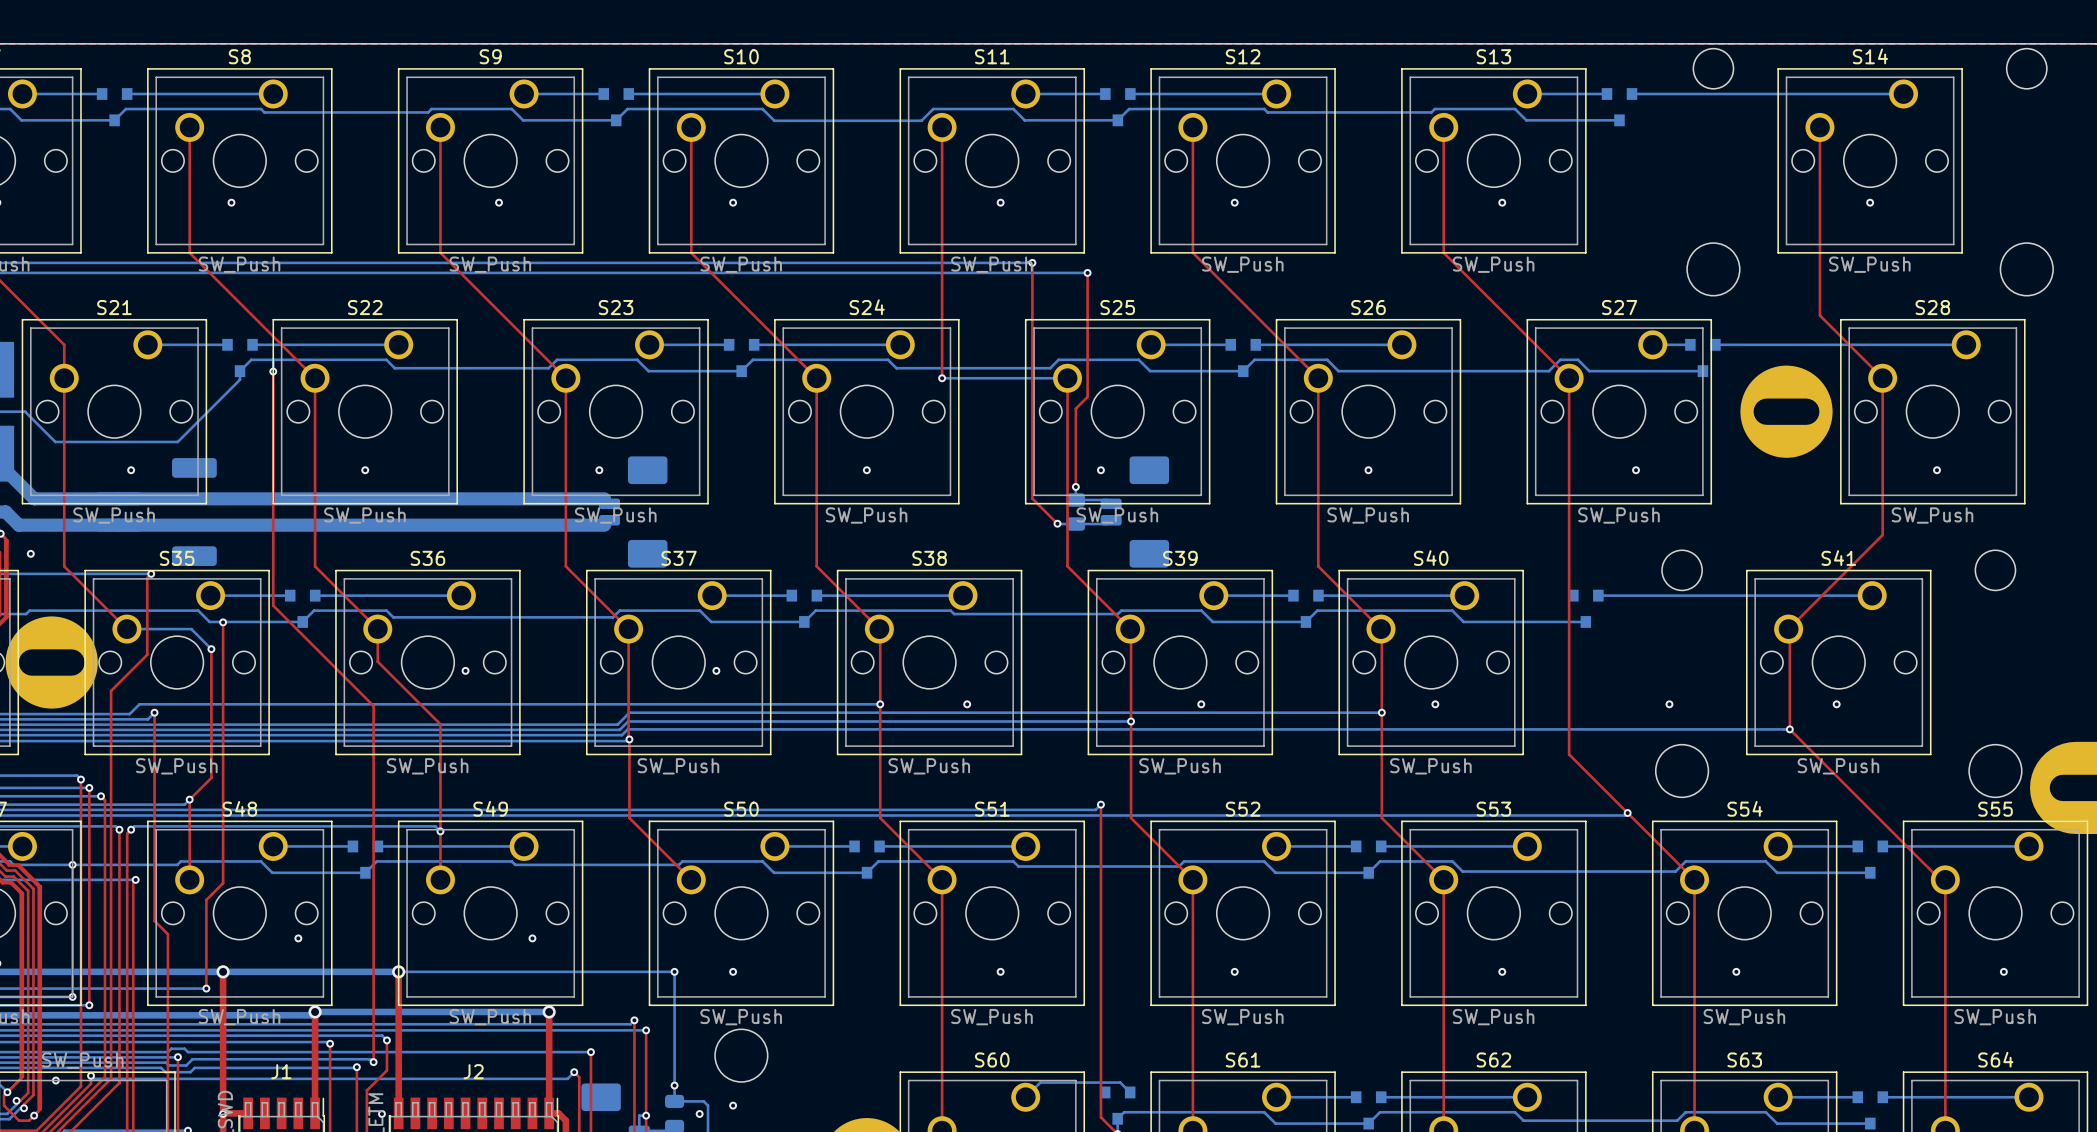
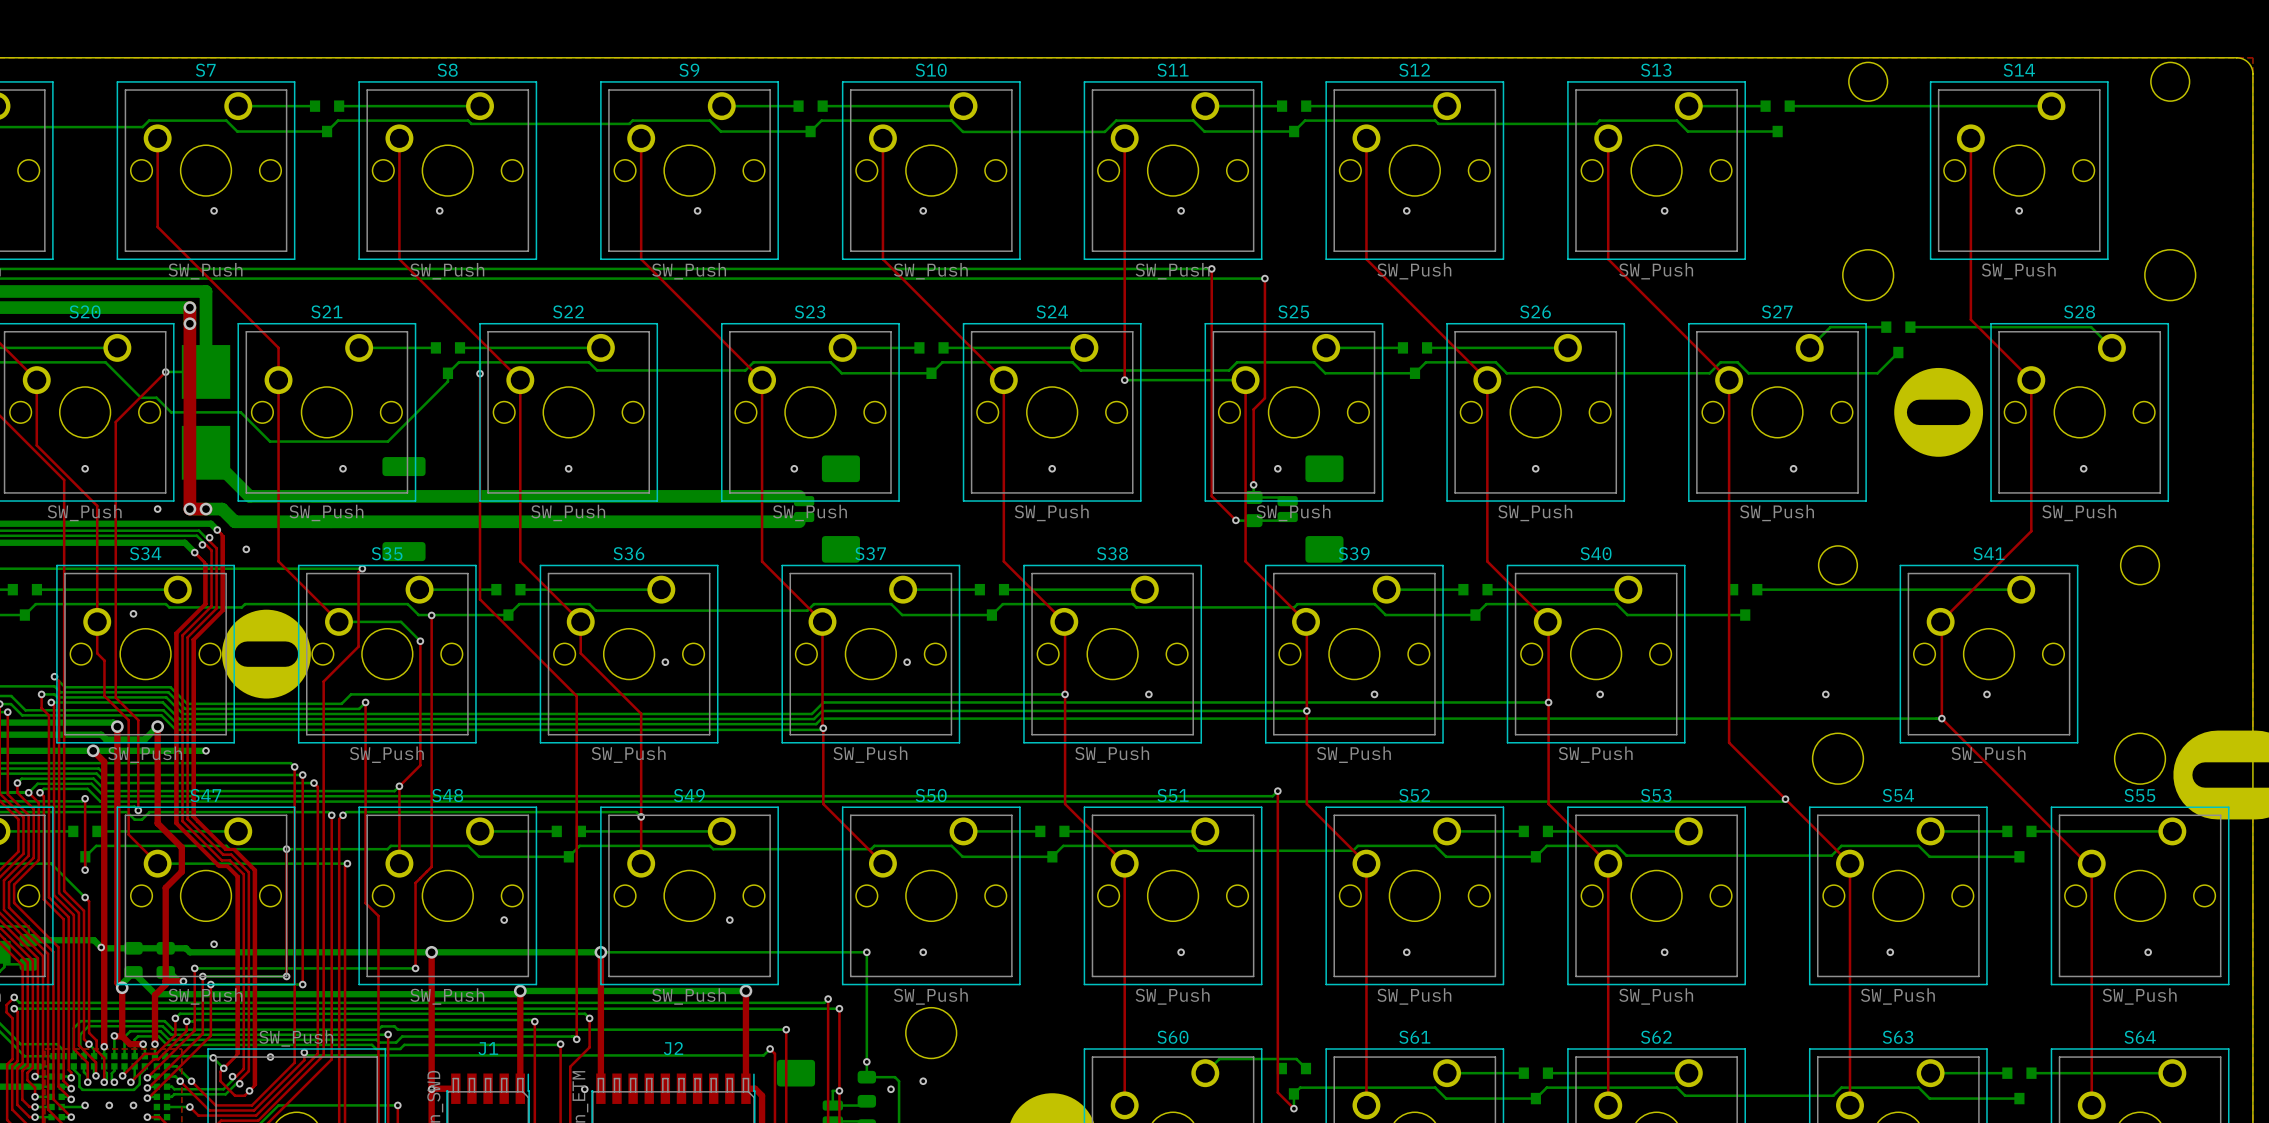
bottom track: (1652, 344) (1690, 344) -> (1809, 347) (1830, 327) (1886, 327)
bottom track: (1715, 344) (1966, 344) -> (1910, 327) (2091, 327) (2111, 347)
bottom track: none -> (1898, 352) (1877, 373) (1858, 373)
part position: (1702, 357) -> (1898, 339)

